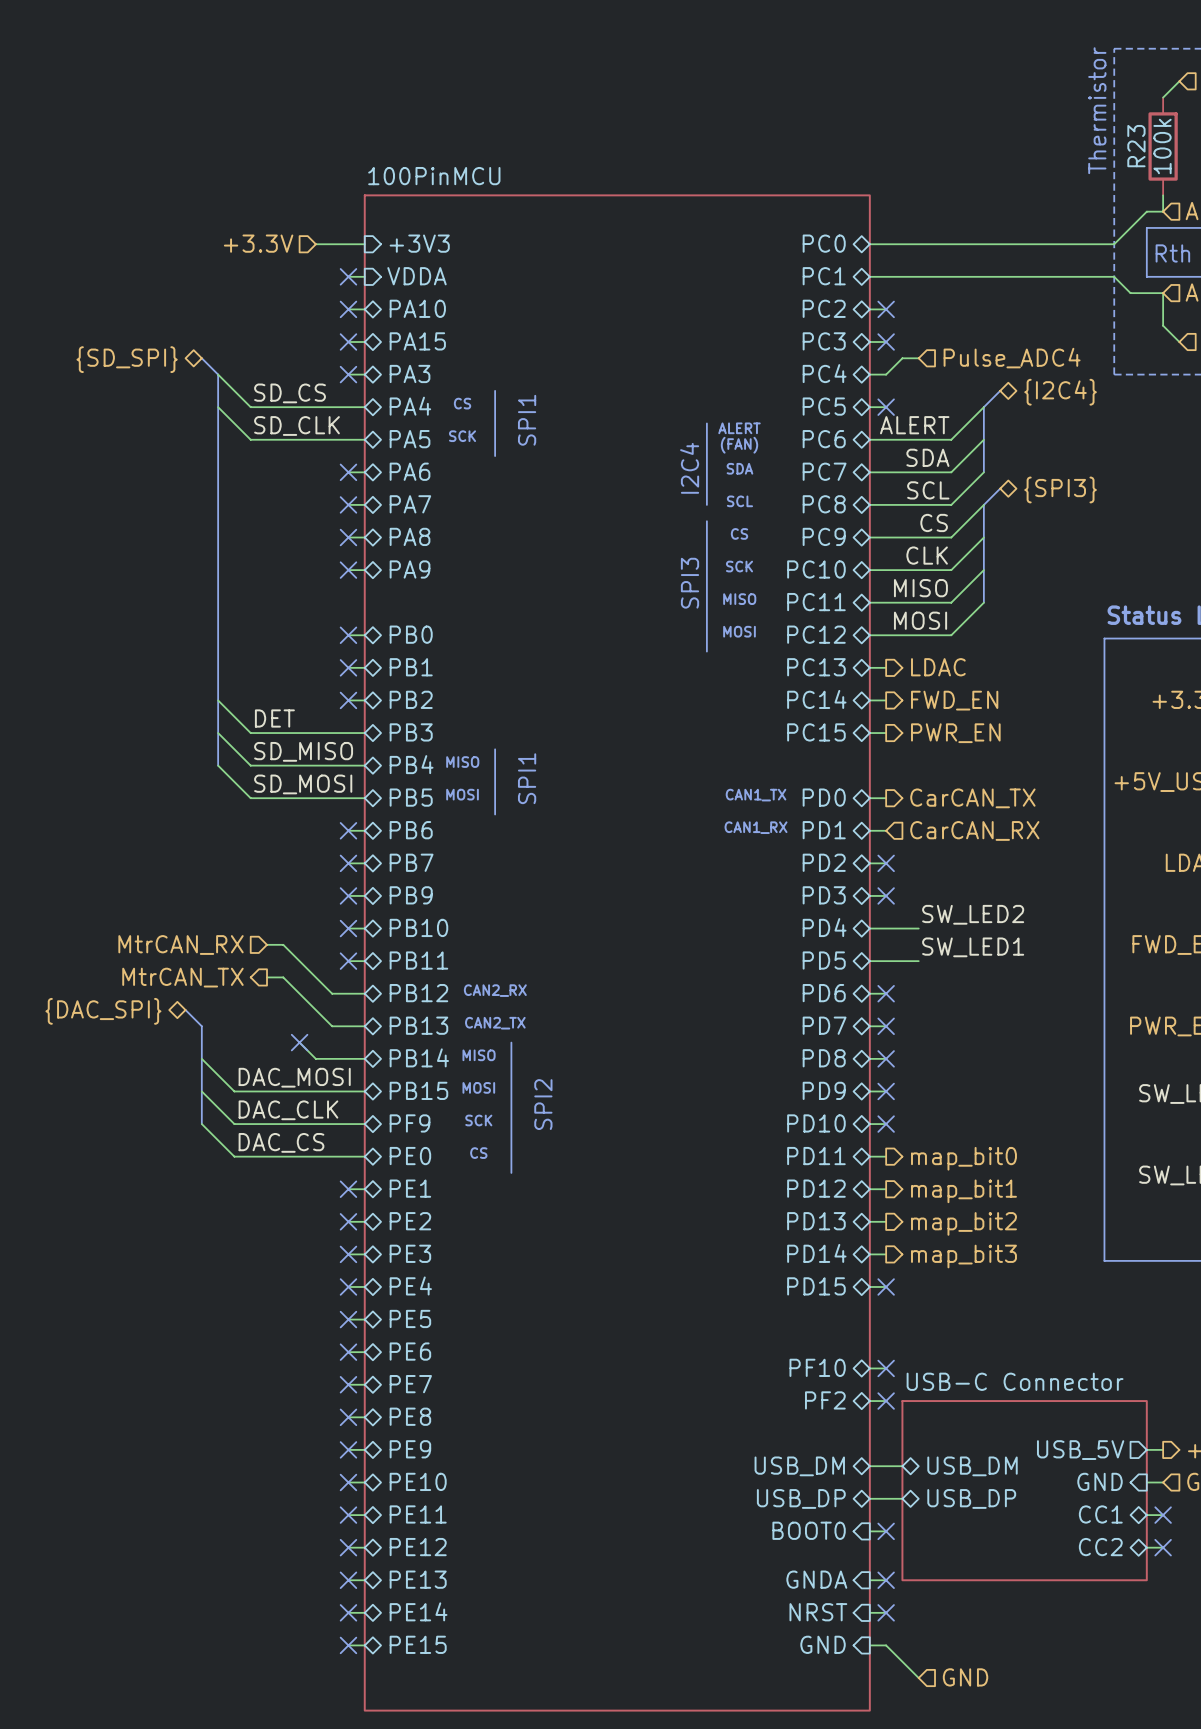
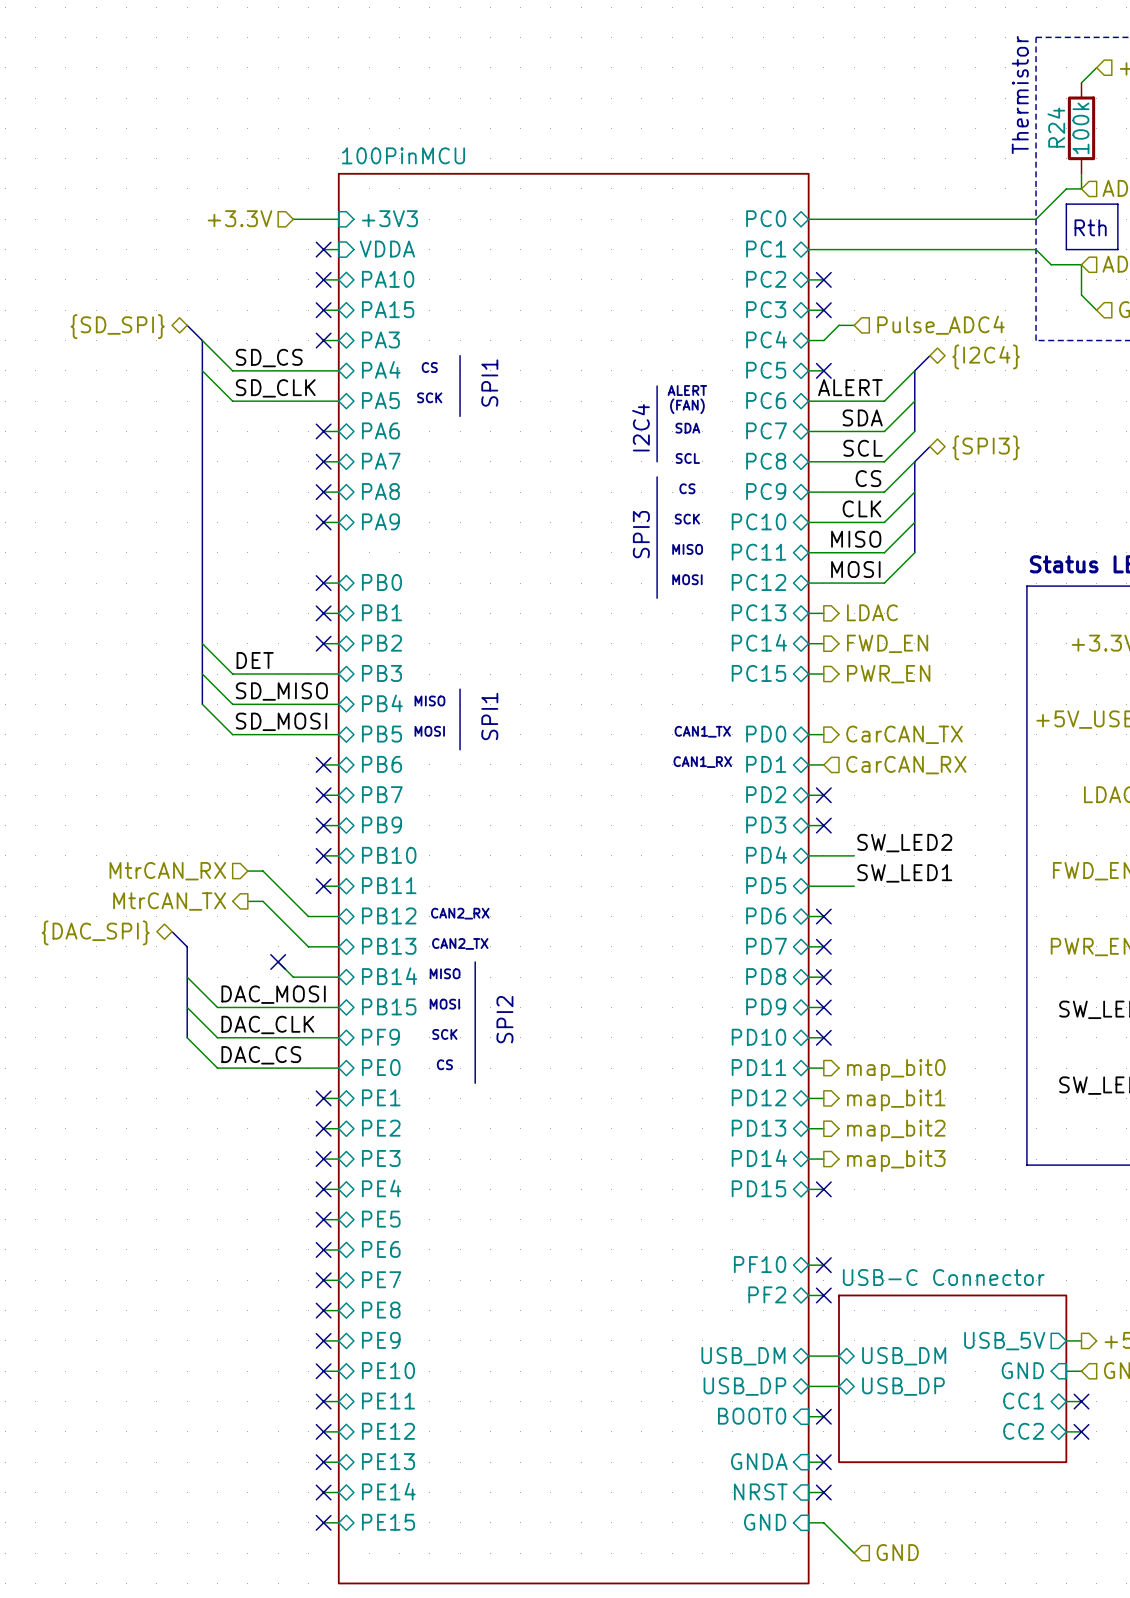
R23 name: R23 (1136, 146) -> R24 (1056, 127)

